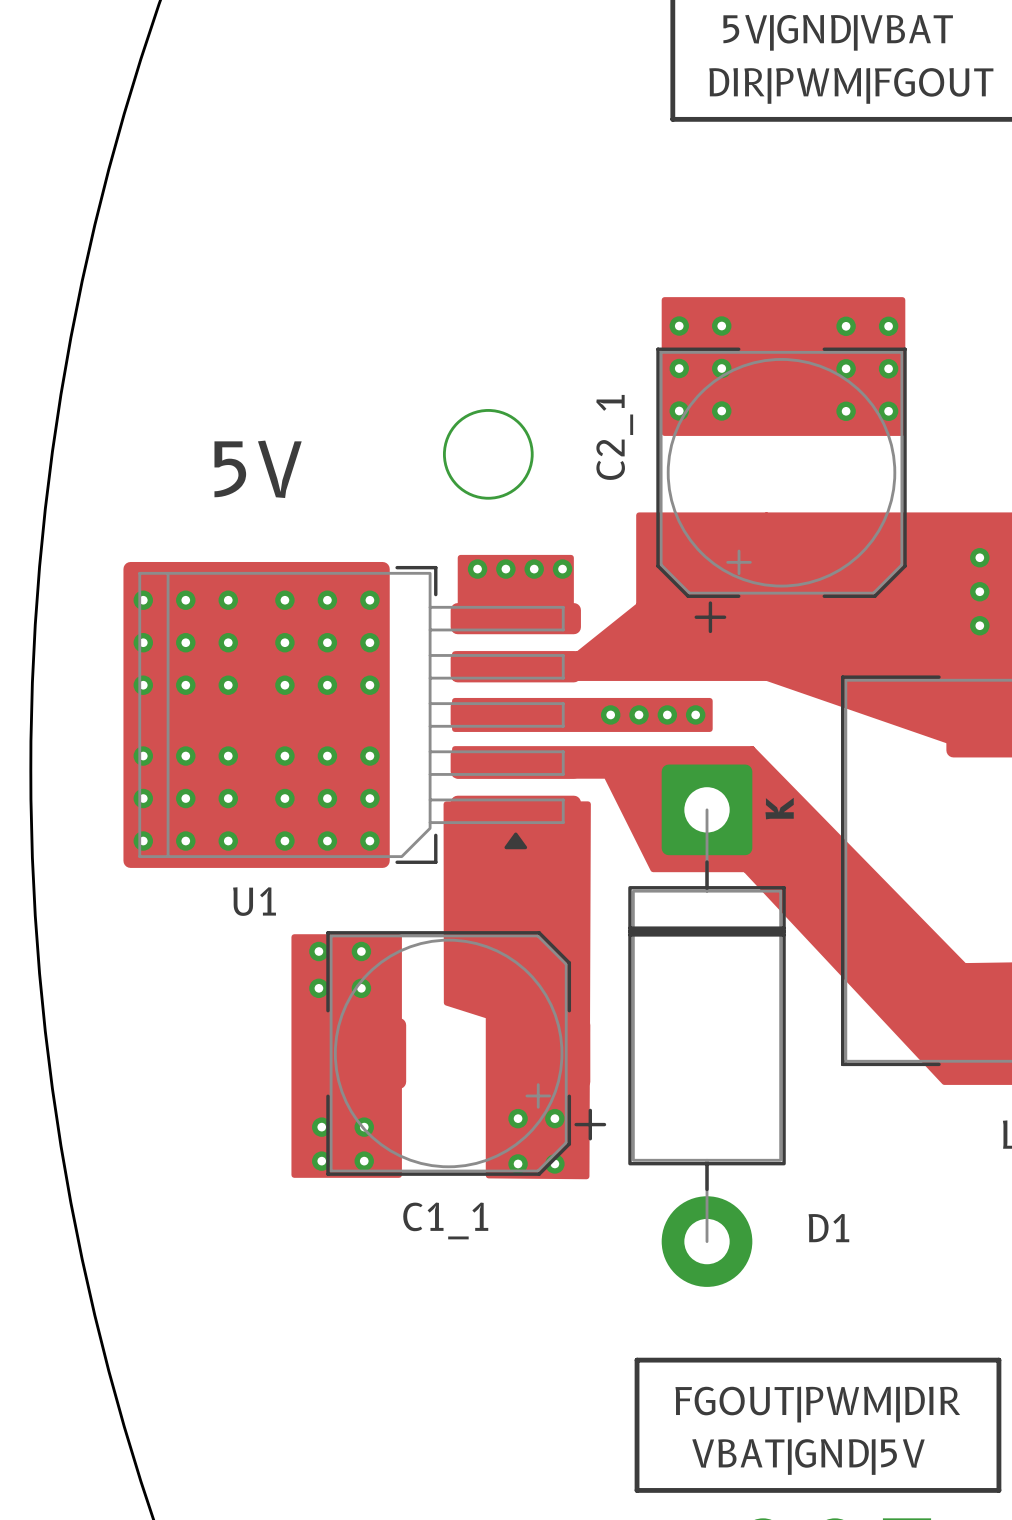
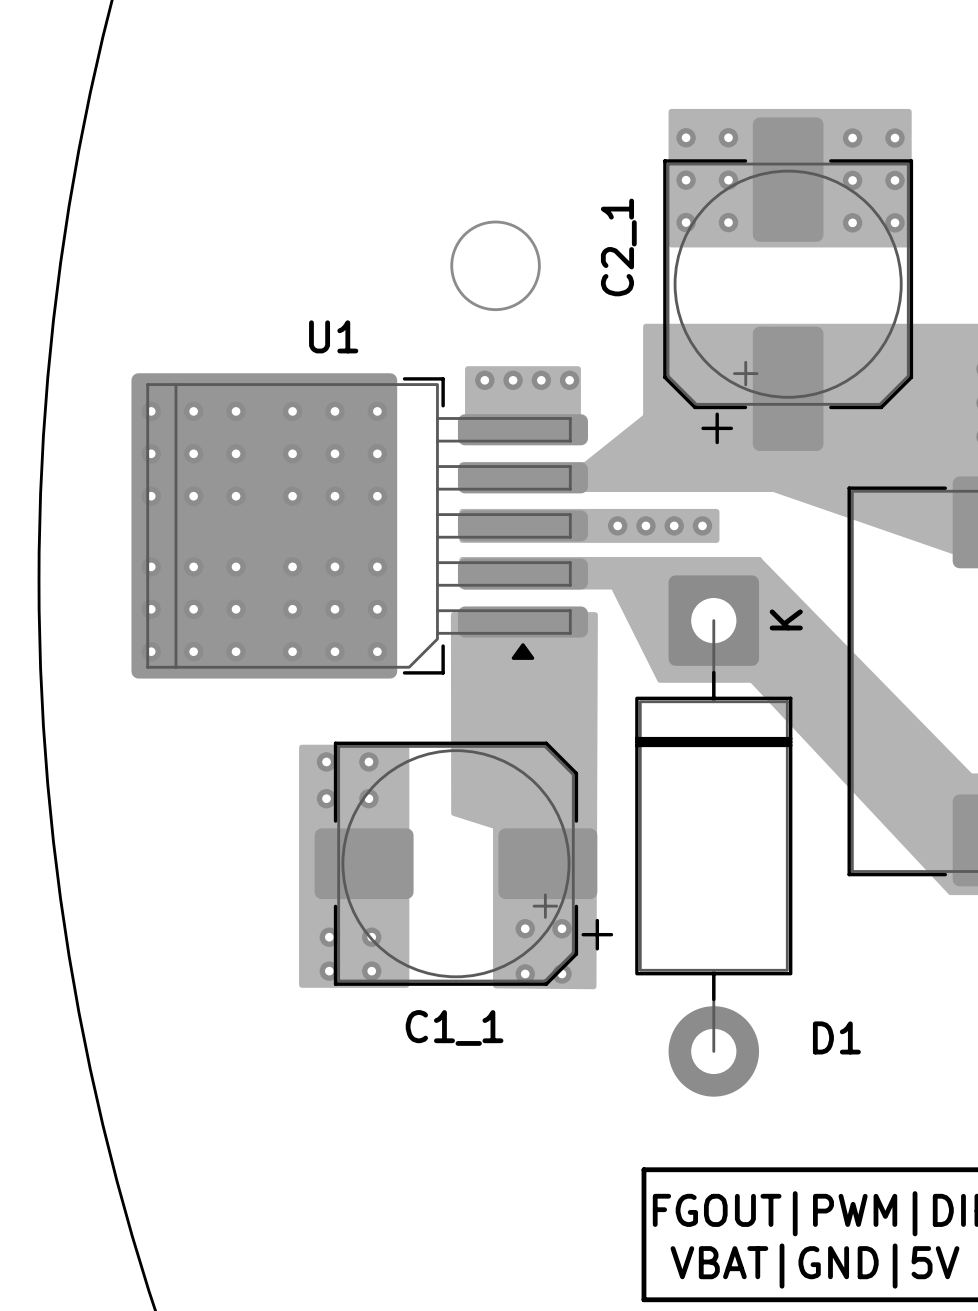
text: 5V (258, 469) -> none
U1 name position: U1 (254, 901) -> U1 (333, 336)

